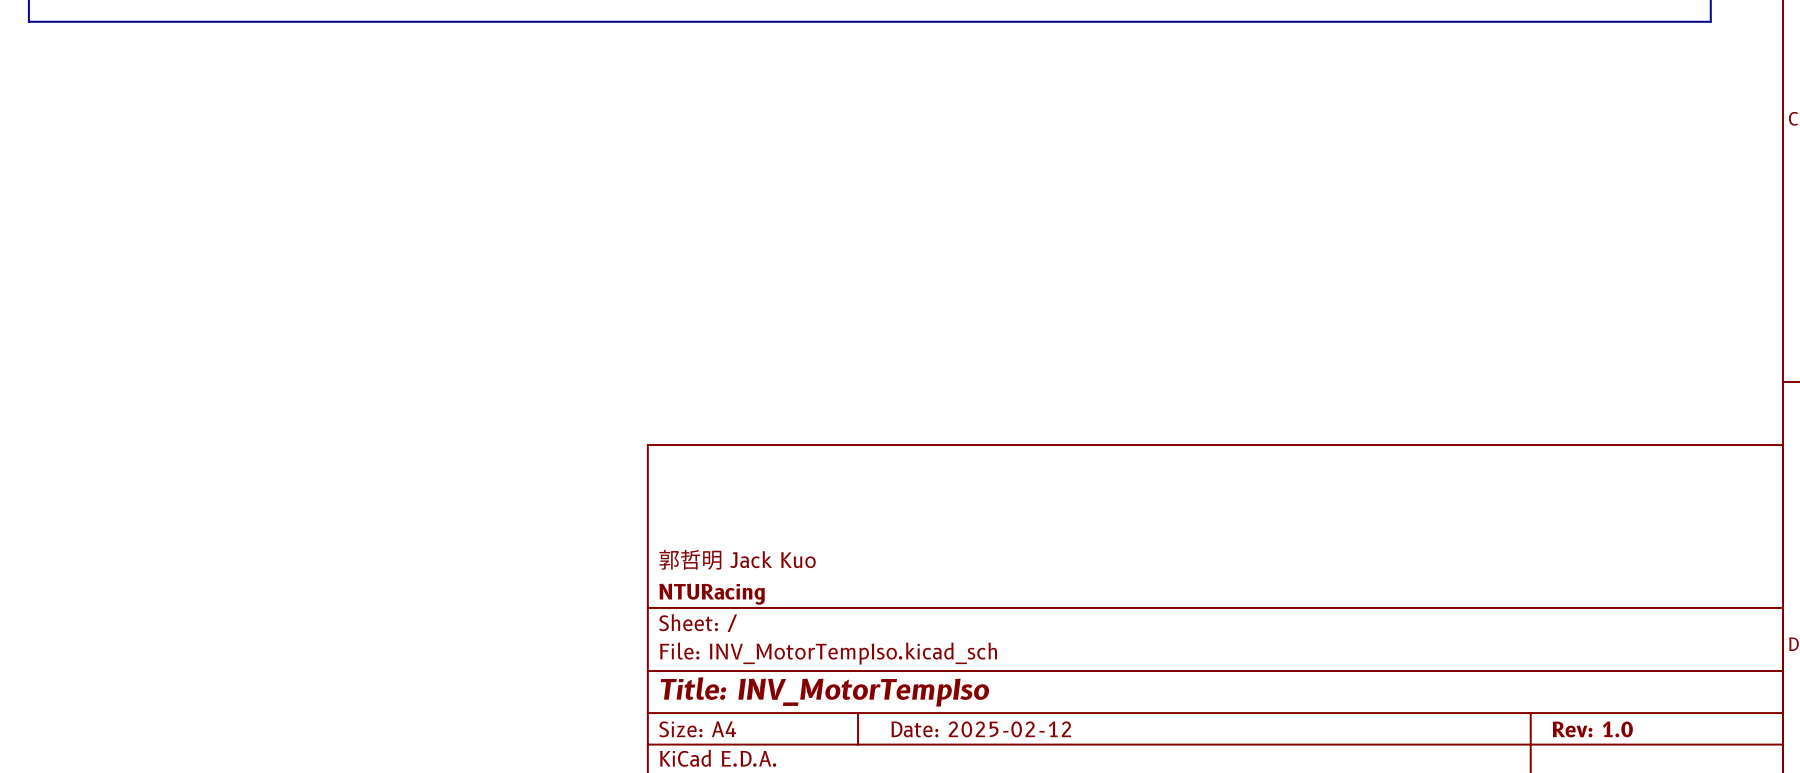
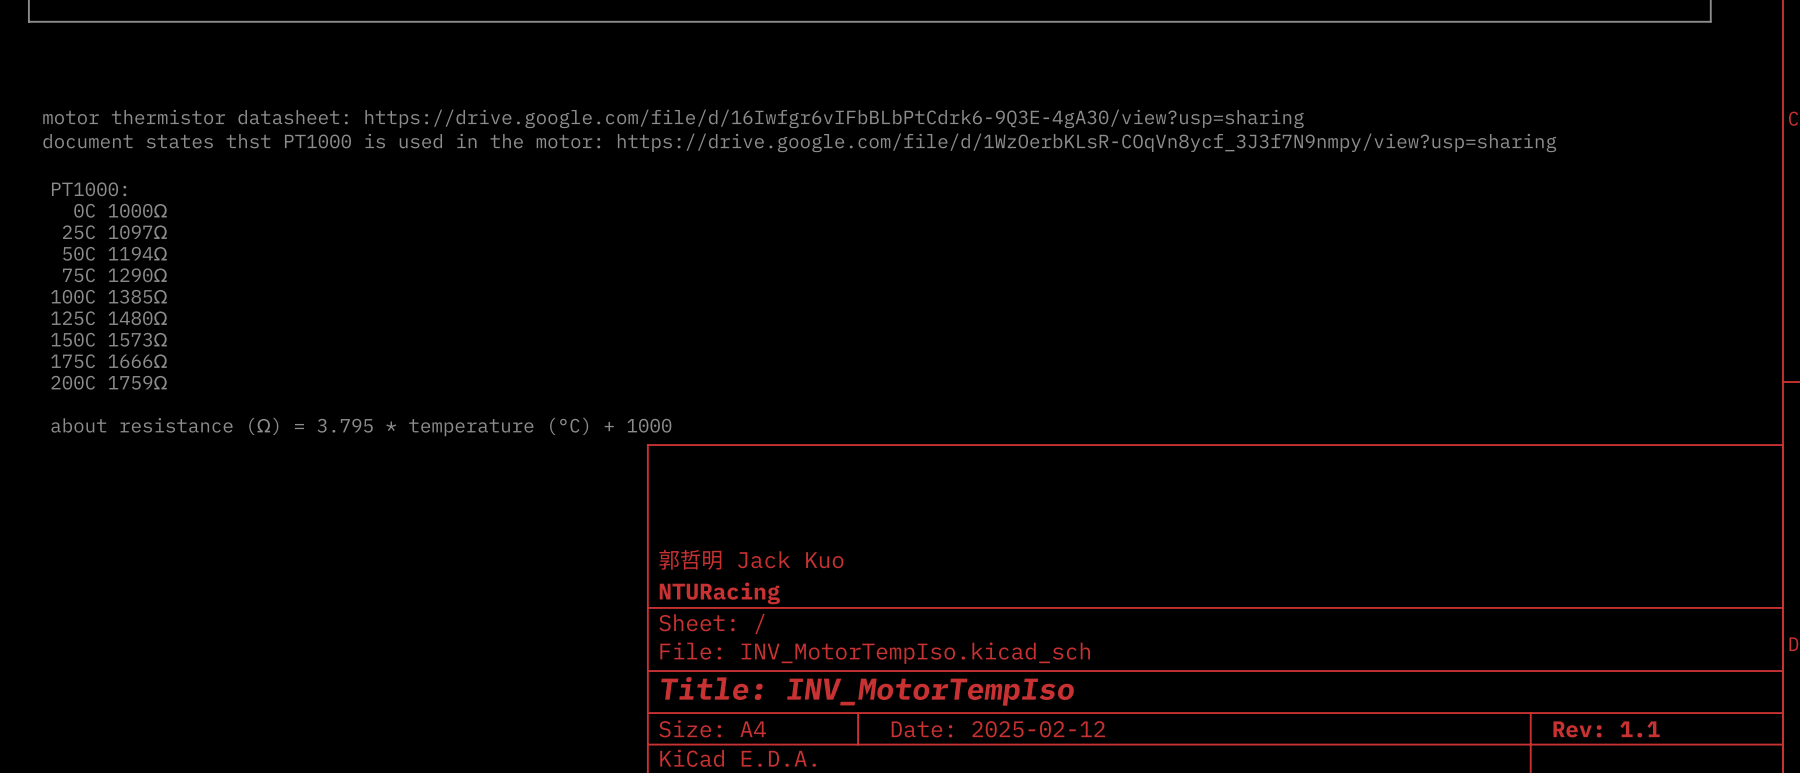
text: none -> motor thermistor datasheet: https://drive.google.com/file/d/16Iwfgr6vIFbBLbPtCdrk6-9Q3E-4gA30/view?usp=sharing (673, 118)
text: none -> document states thst PT1000 is used in the motor: https://drive.google.com/file/d/1WzOerbKLsR-COqVn8ycf_3J3f7N9nmpy/view?usp=sharing (799, 142)
text: none -> PT1000: (89, 189)
text: none -> 0C 1000Ω (120, 210)
text: none -> 25C 1097Ω (114, 232)
text: none -> 50C 1194Ω (114, 253)
text: none -> 75C 1290Ω (114, 275)
text: none -> 100C 1385Ω (109, 296)
text: none -> 125C 1480Ω (109, 318)
text: none -> 150C 1573Ω (109, 339)
text: none -> 175C 1666Ω (109, 361)
text: none -> 200C 1759Ω (109, 382)
text: none -> about resistance (Ω) = 3.795 * temperature (°C) + 1000 (361, 427)
title block: Rev: 1.0 (1592, 729) -> Rev: 1.1 (1606, 729)

